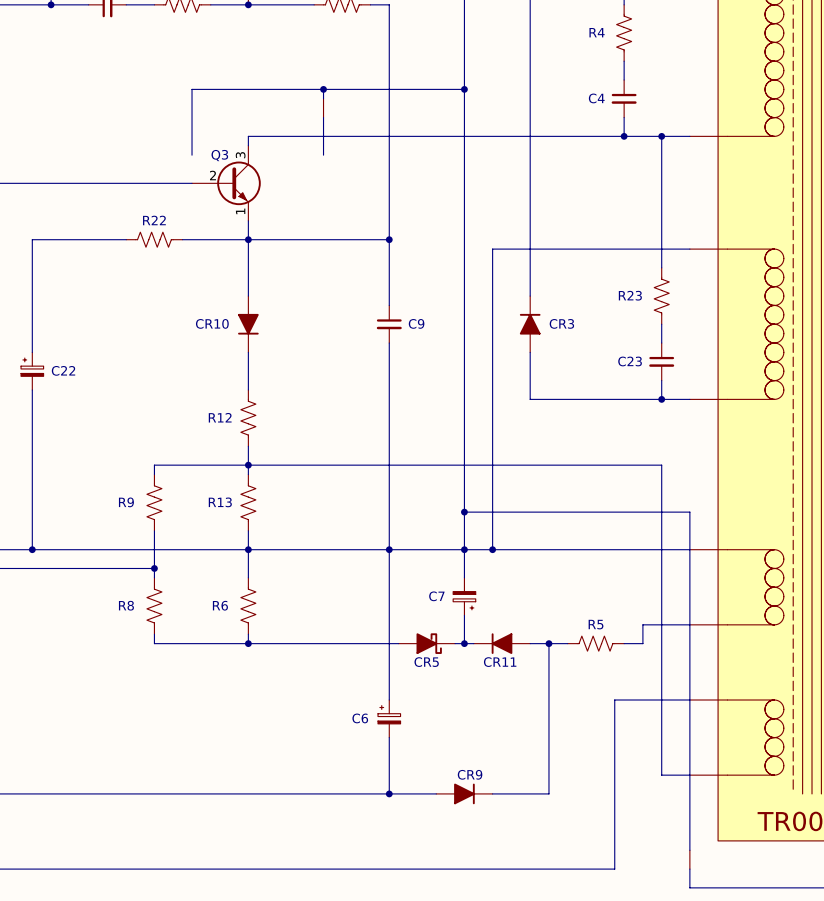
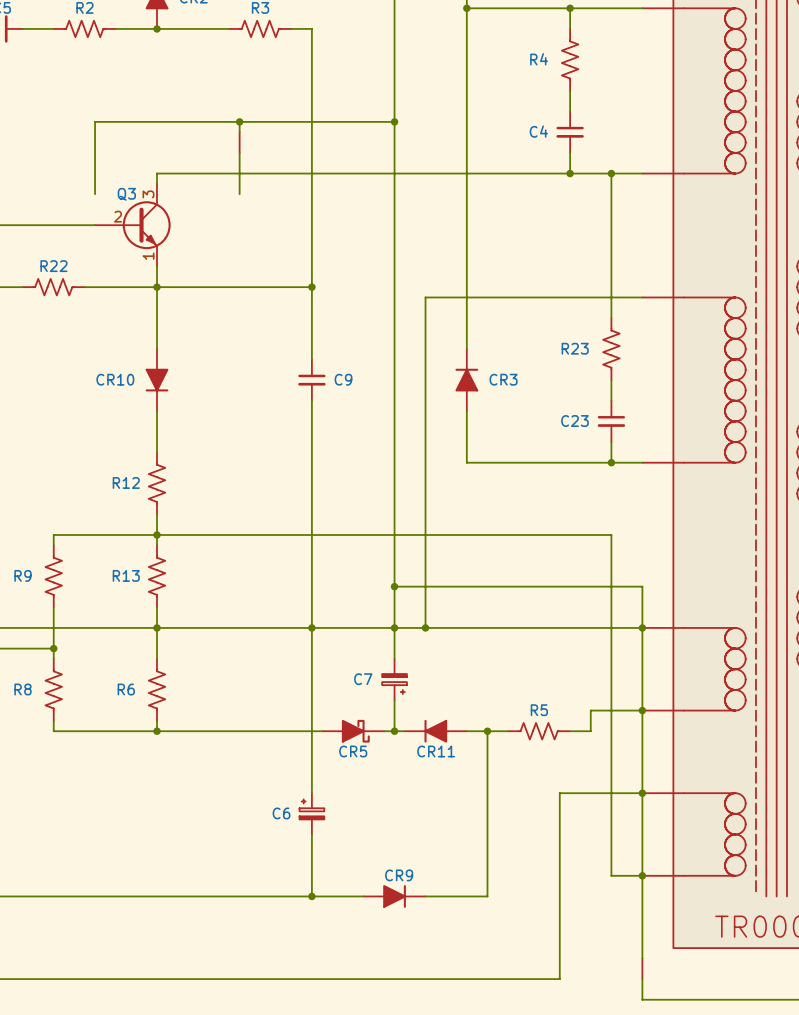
junction: none -> (642, 627)
junction: none -> (642, 710)
junction: none -> (642, 793)
junction: none -> (642, 875)

